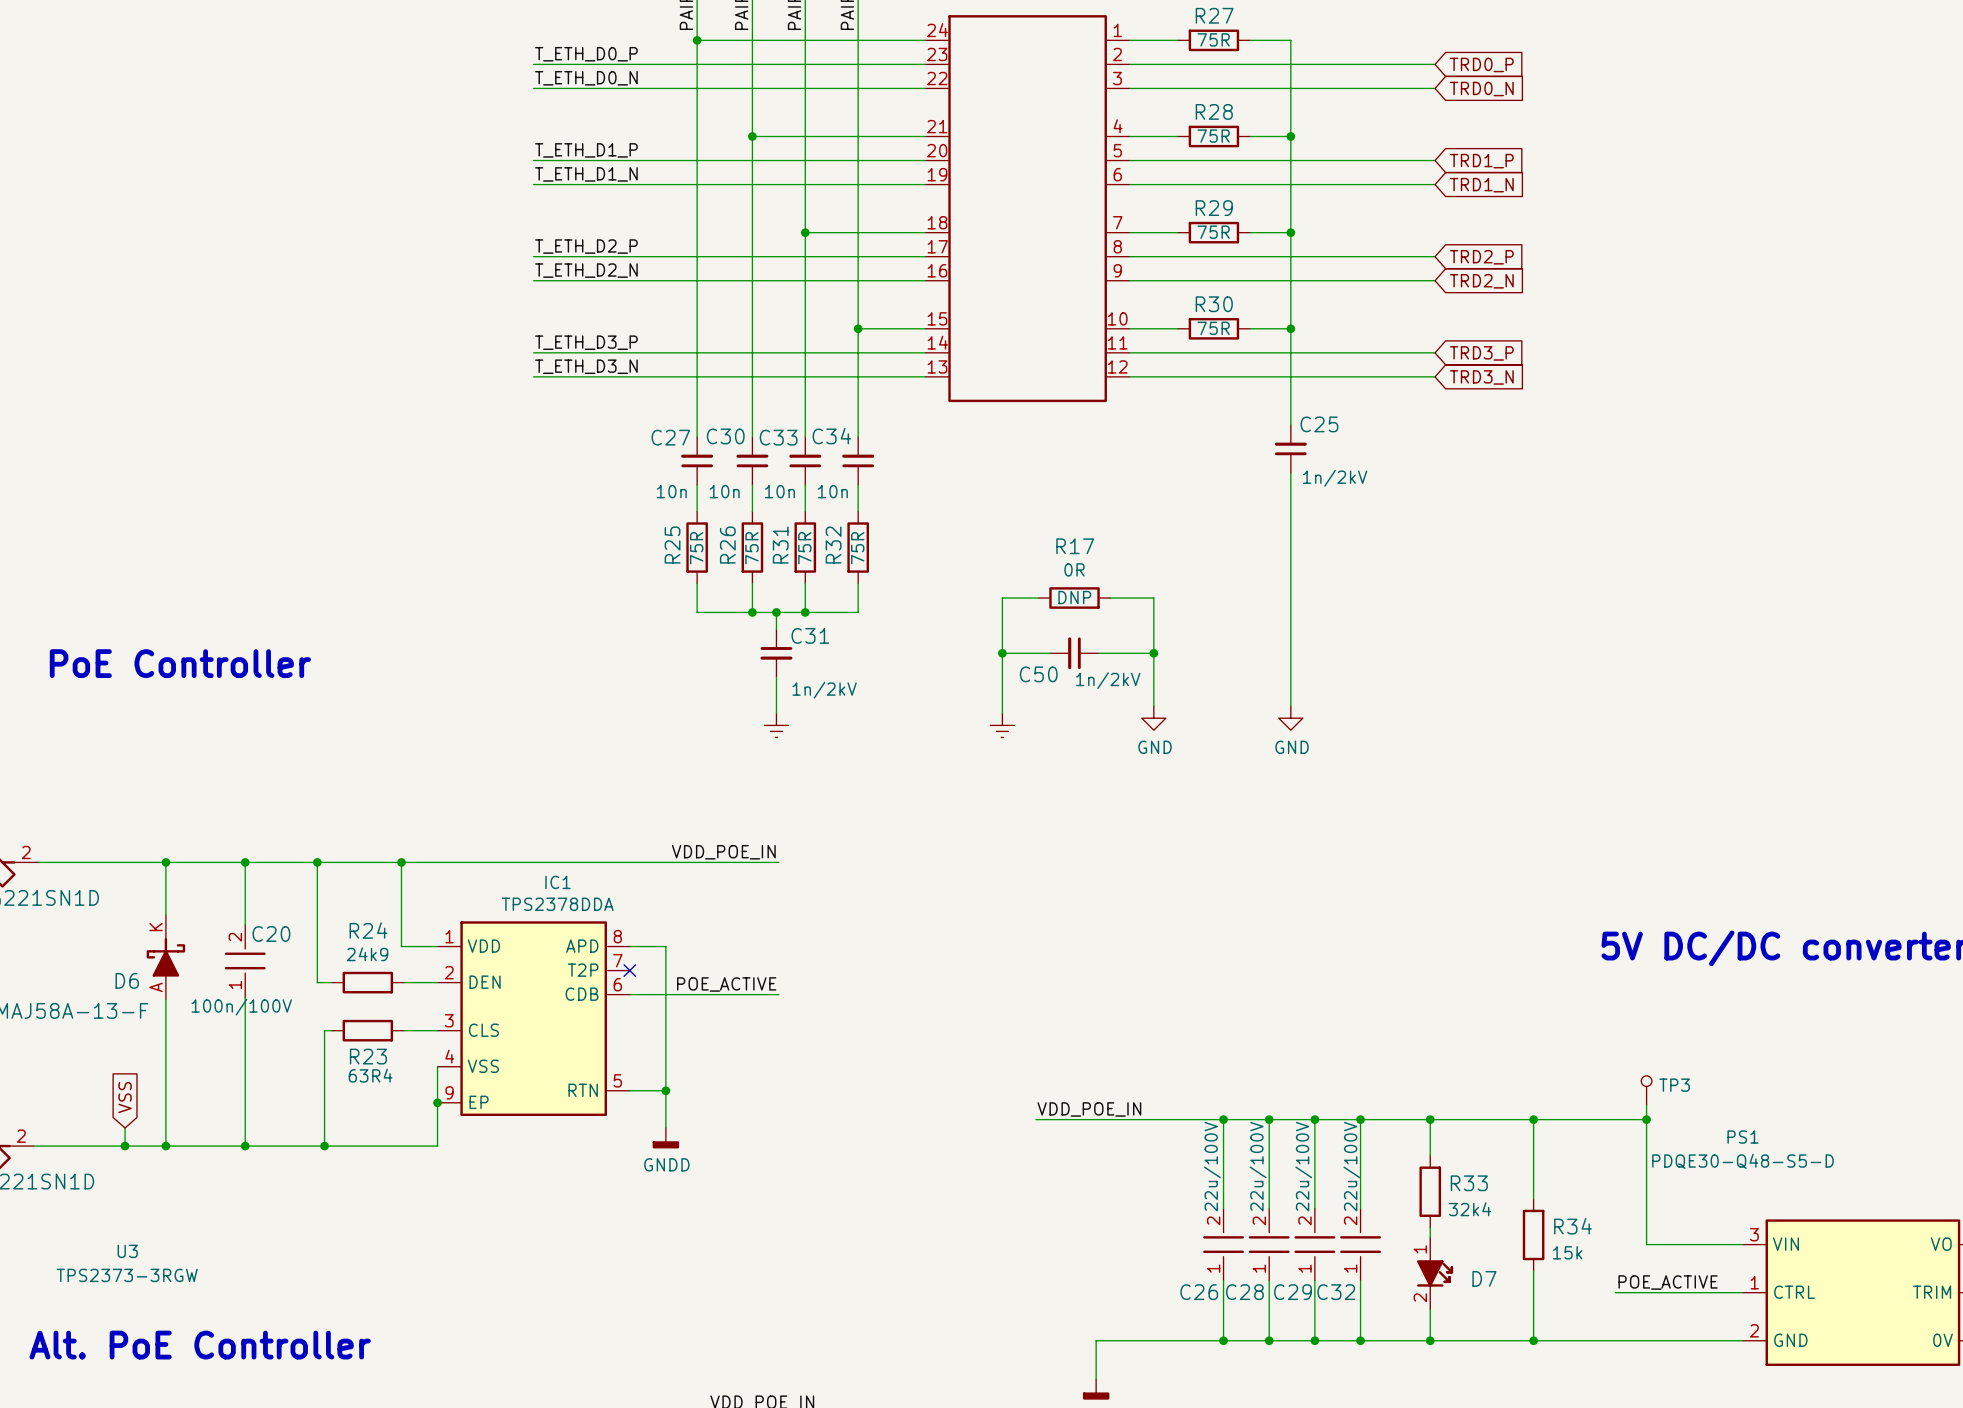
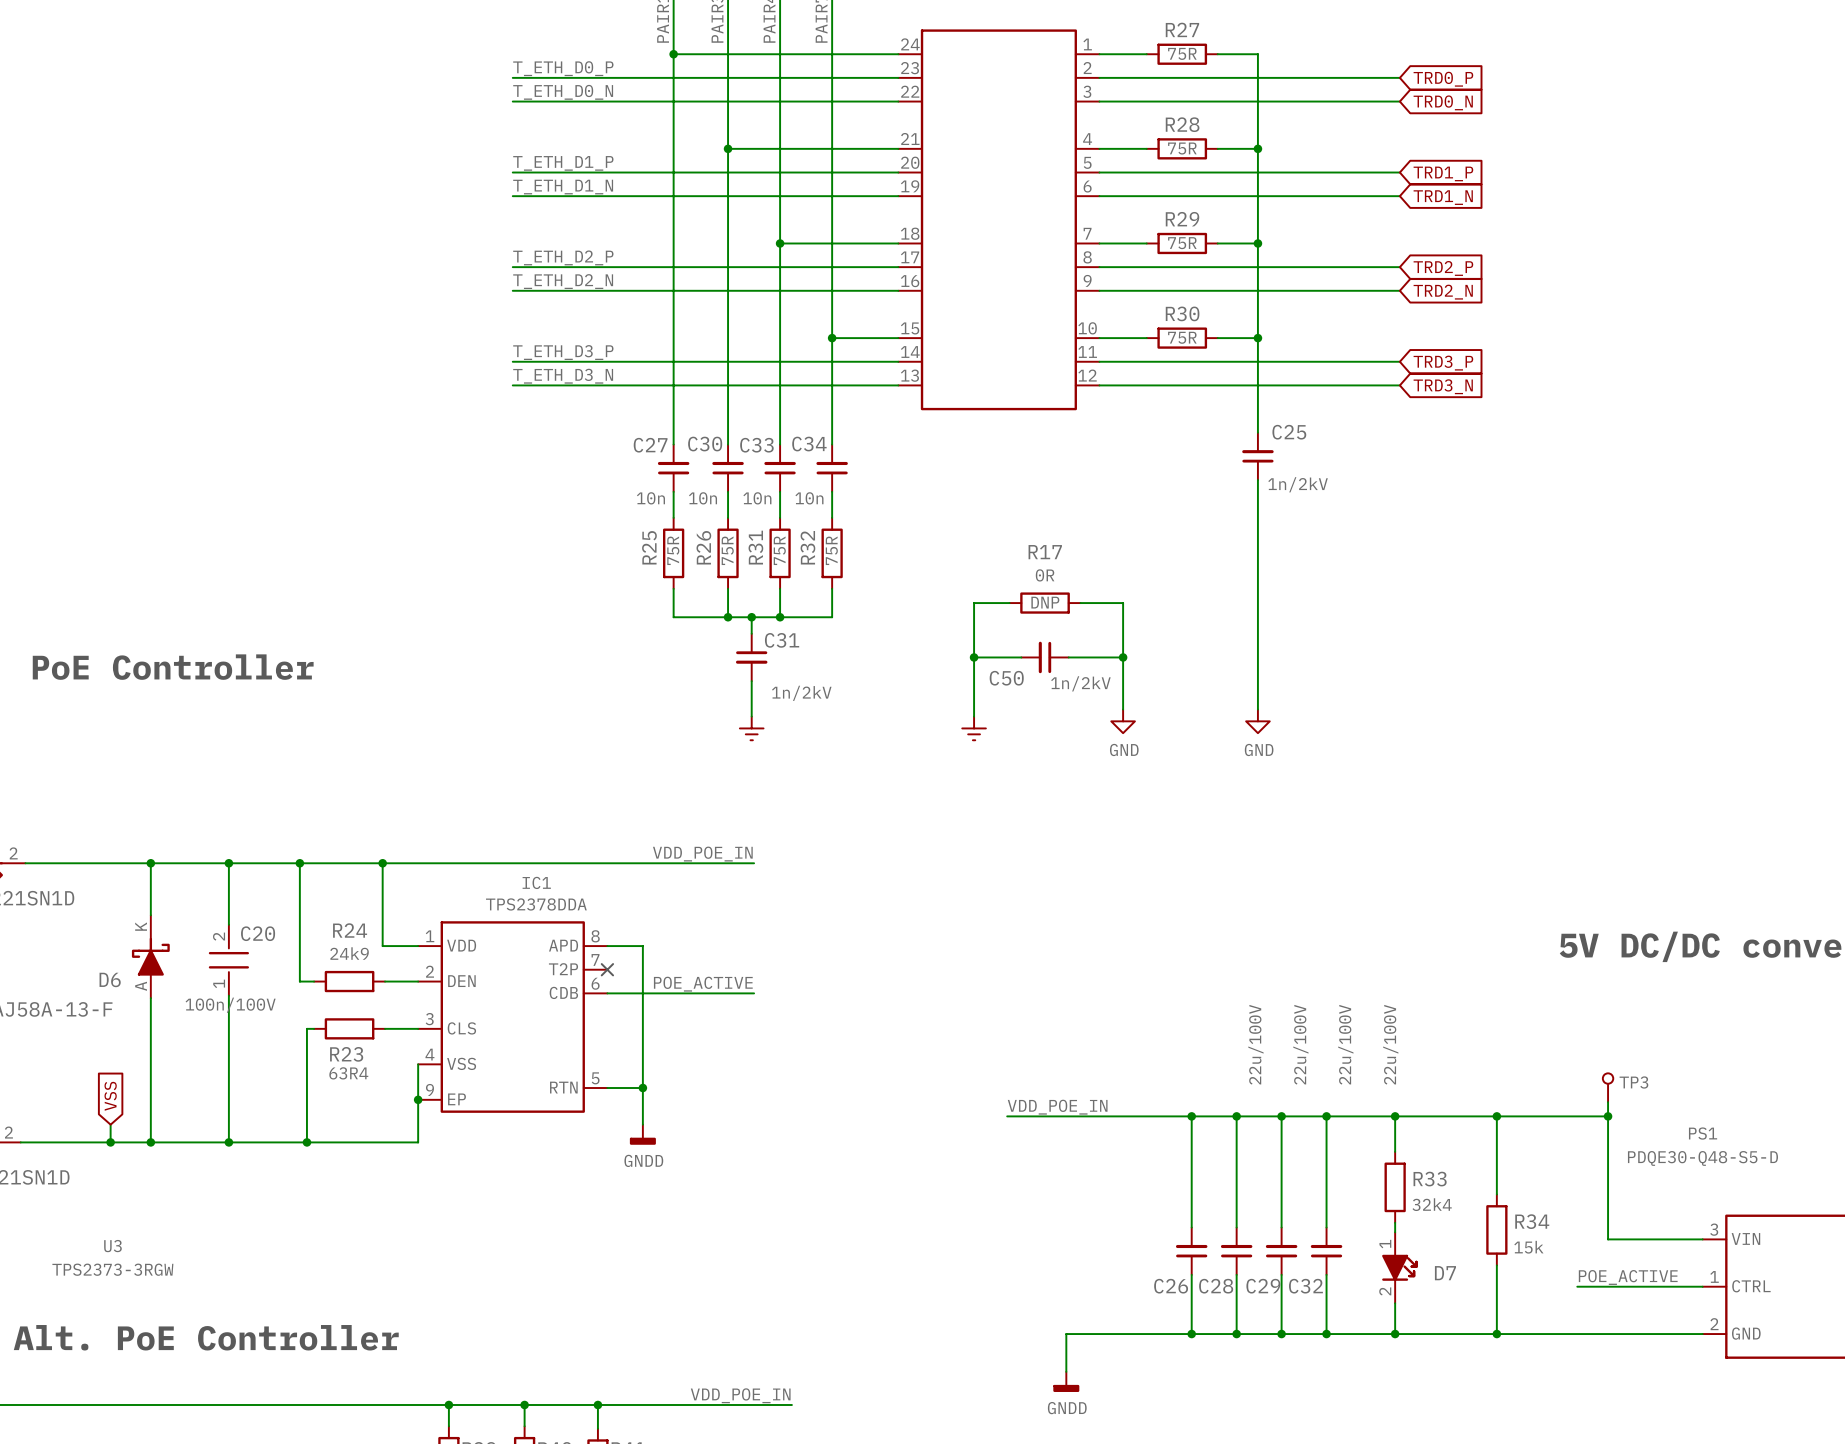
C26 text position: 22u/100V (1212, 1166) -> 22u/100V (1255, 1044)
C28 text position: 22u/100V (1258, 1166) -> 22u/100V (1300, 1044)
C29 text position: 22u/100V (1303, 1166) -> 22u/100V (1345, 1044)
C32 text position: 22u/100V (1351, 1166) -> 22u/100V (1390, 1044)
C26 symbol: [1203, 1208, 1244, 1281] -> [1175, 1227, 1208, 1275]
C28 symbol: [1248, 1208, 1290, 1281] -> [1220, 1227, 1253, 1275]
C29 symbol: [1294, 1208, 1336, 1281] -> [1265, 1227, 1298, 1275]
C32 symbol: [1340, 1208, 1381, 1281] -> [1310, 1227, 1343, 1275]

